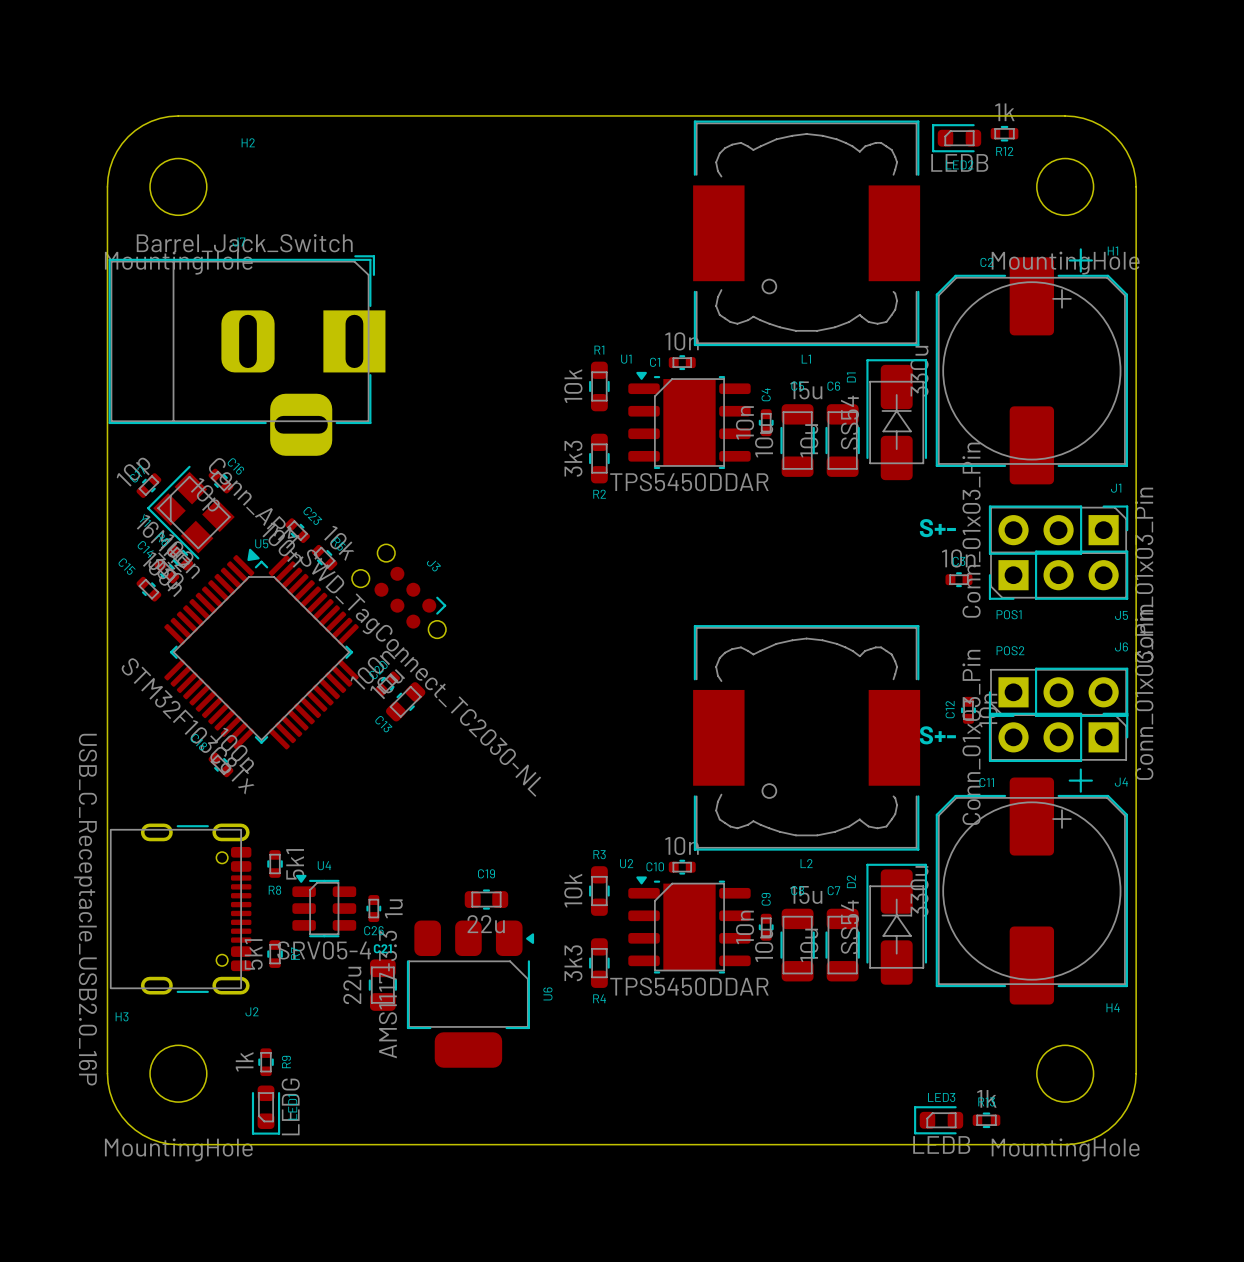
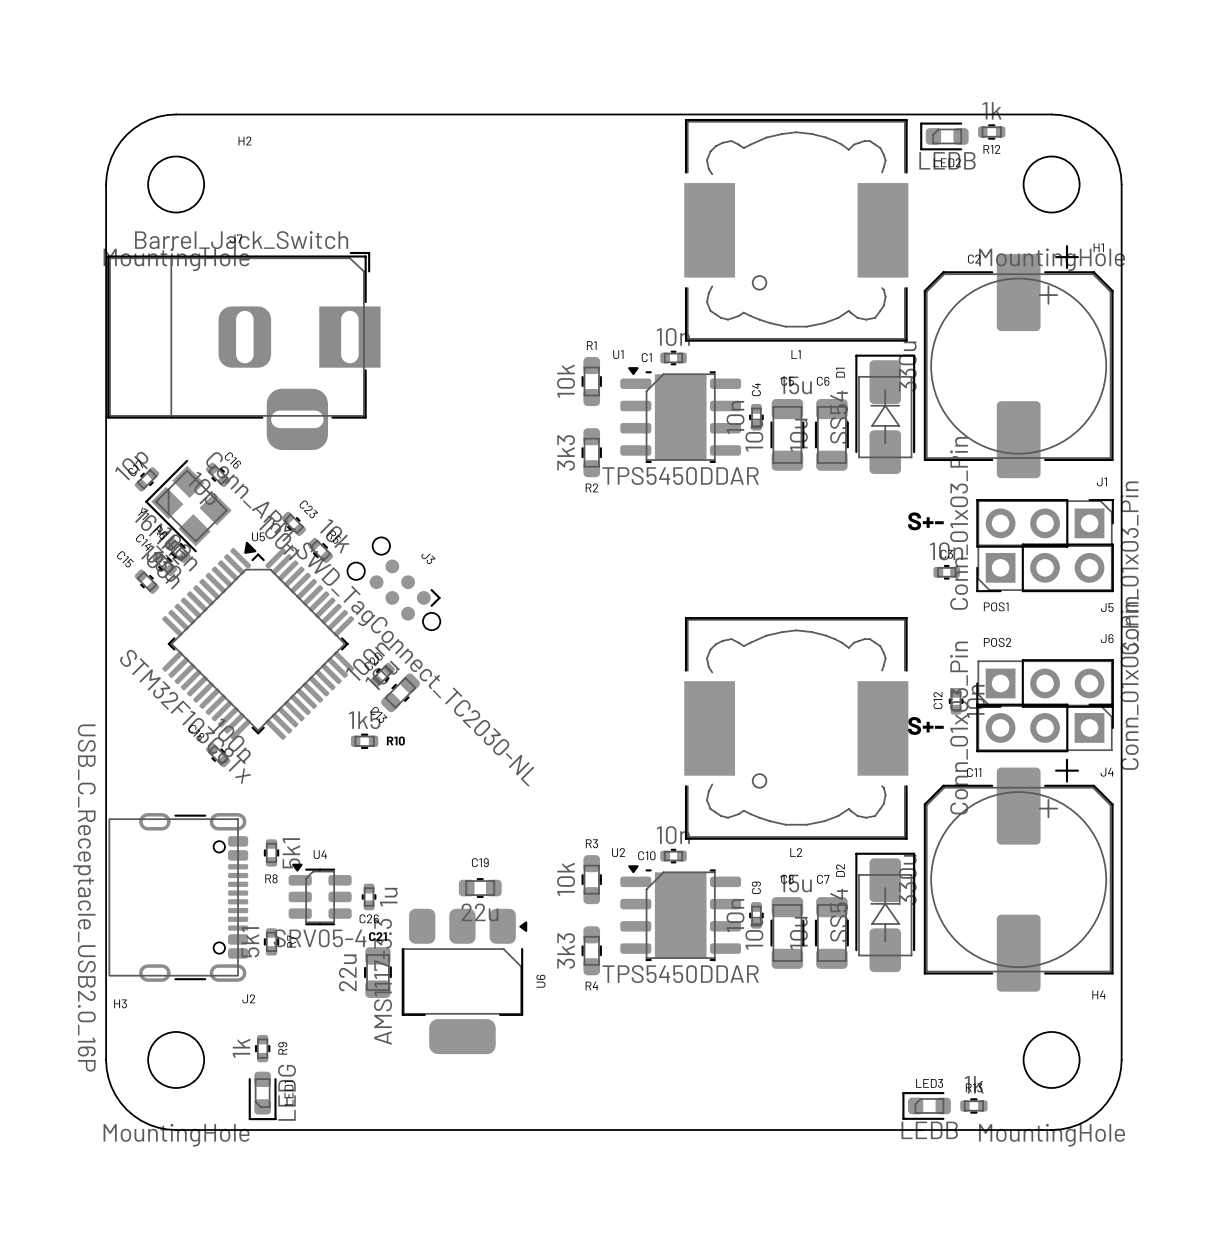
R10: none -> 1k5 (364, 741)

